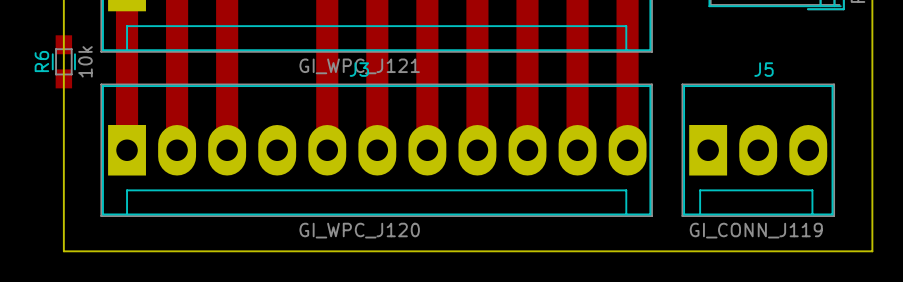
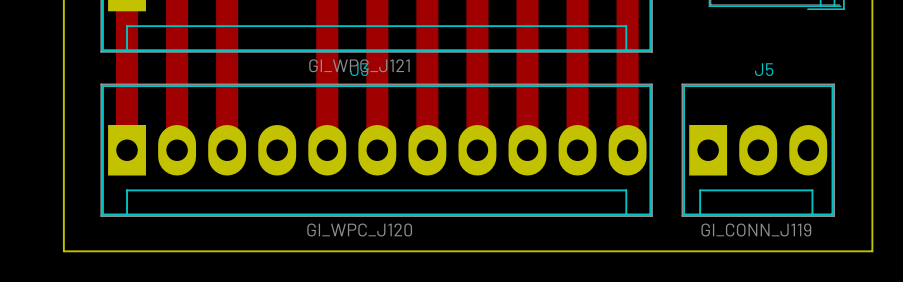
R6: 10k (63, 61) -> none

